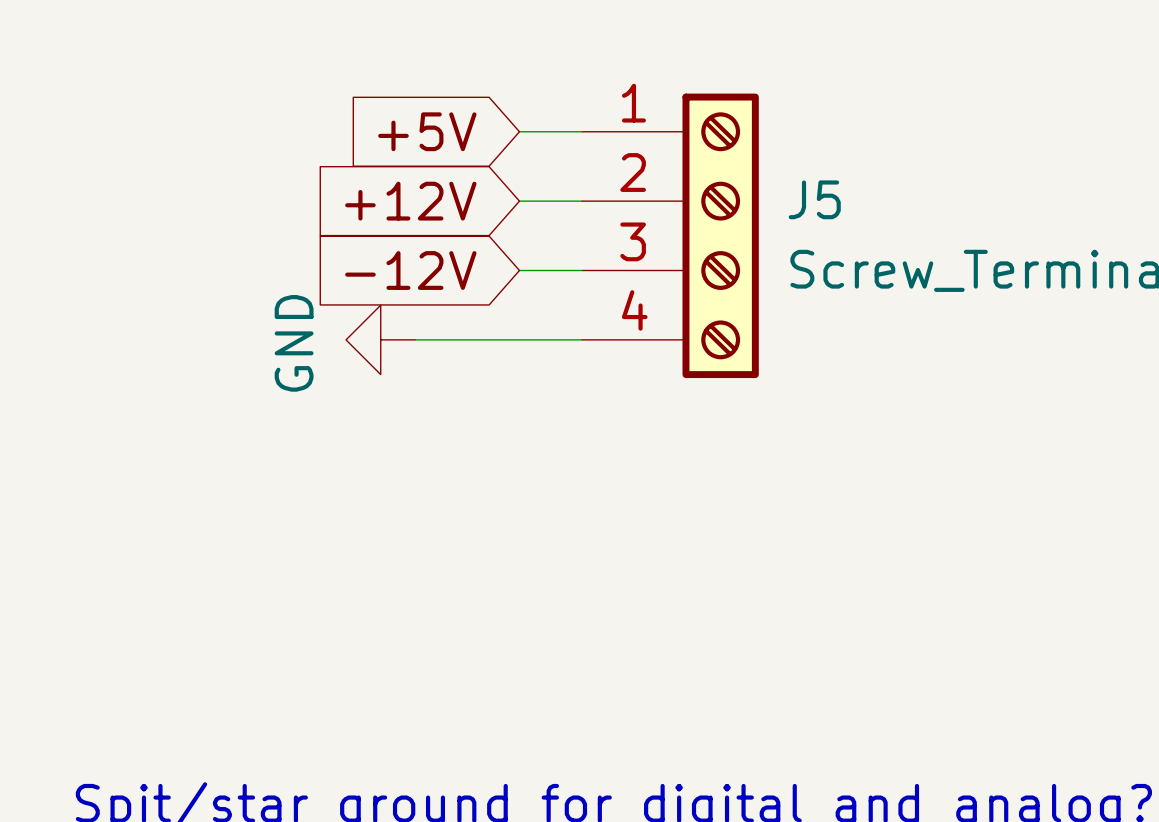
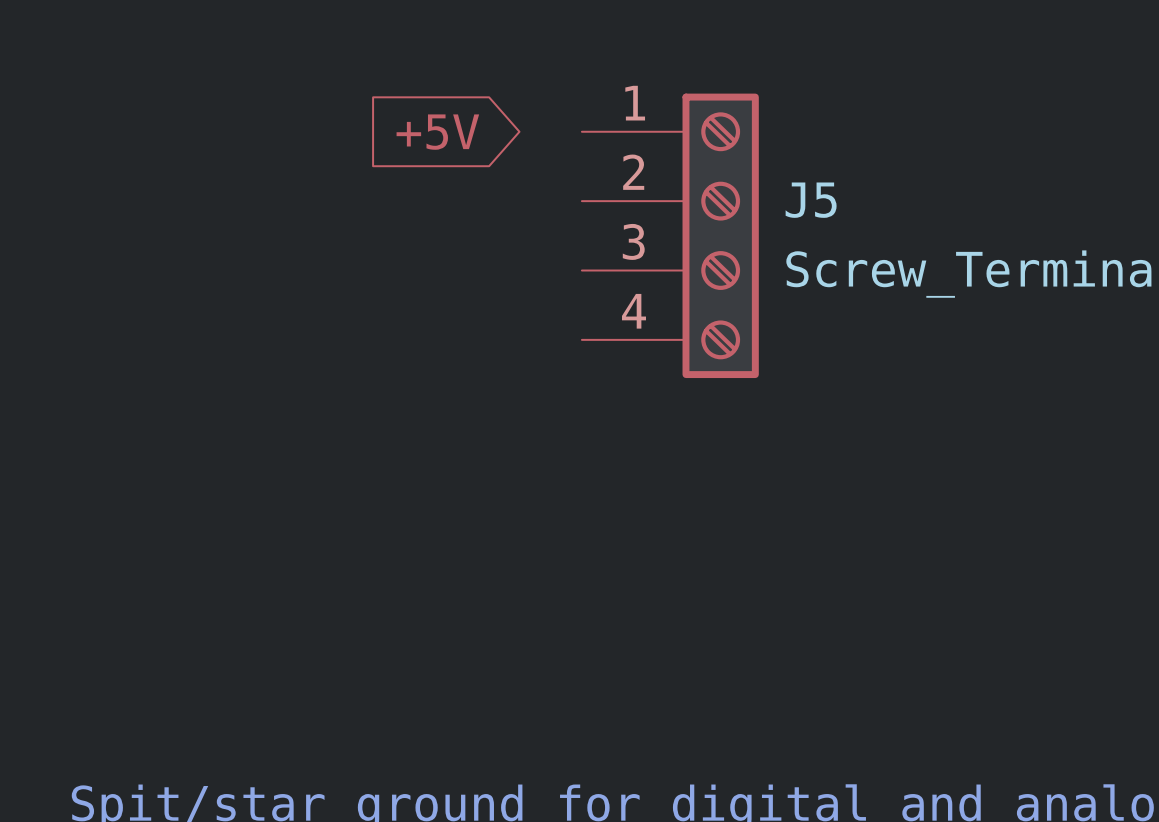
wire: (519, 131) (581, 131) -> none
global label: +12V (410, 201) -> none
wire: (519, 201) (581, 201) -> none
global label: -12V (410, 270) -> none
wire: (519, 270) (581, 270) -> none
power symbol: GND (380, 339) -> none
wire: (415, 339) (581, 339) -> none

